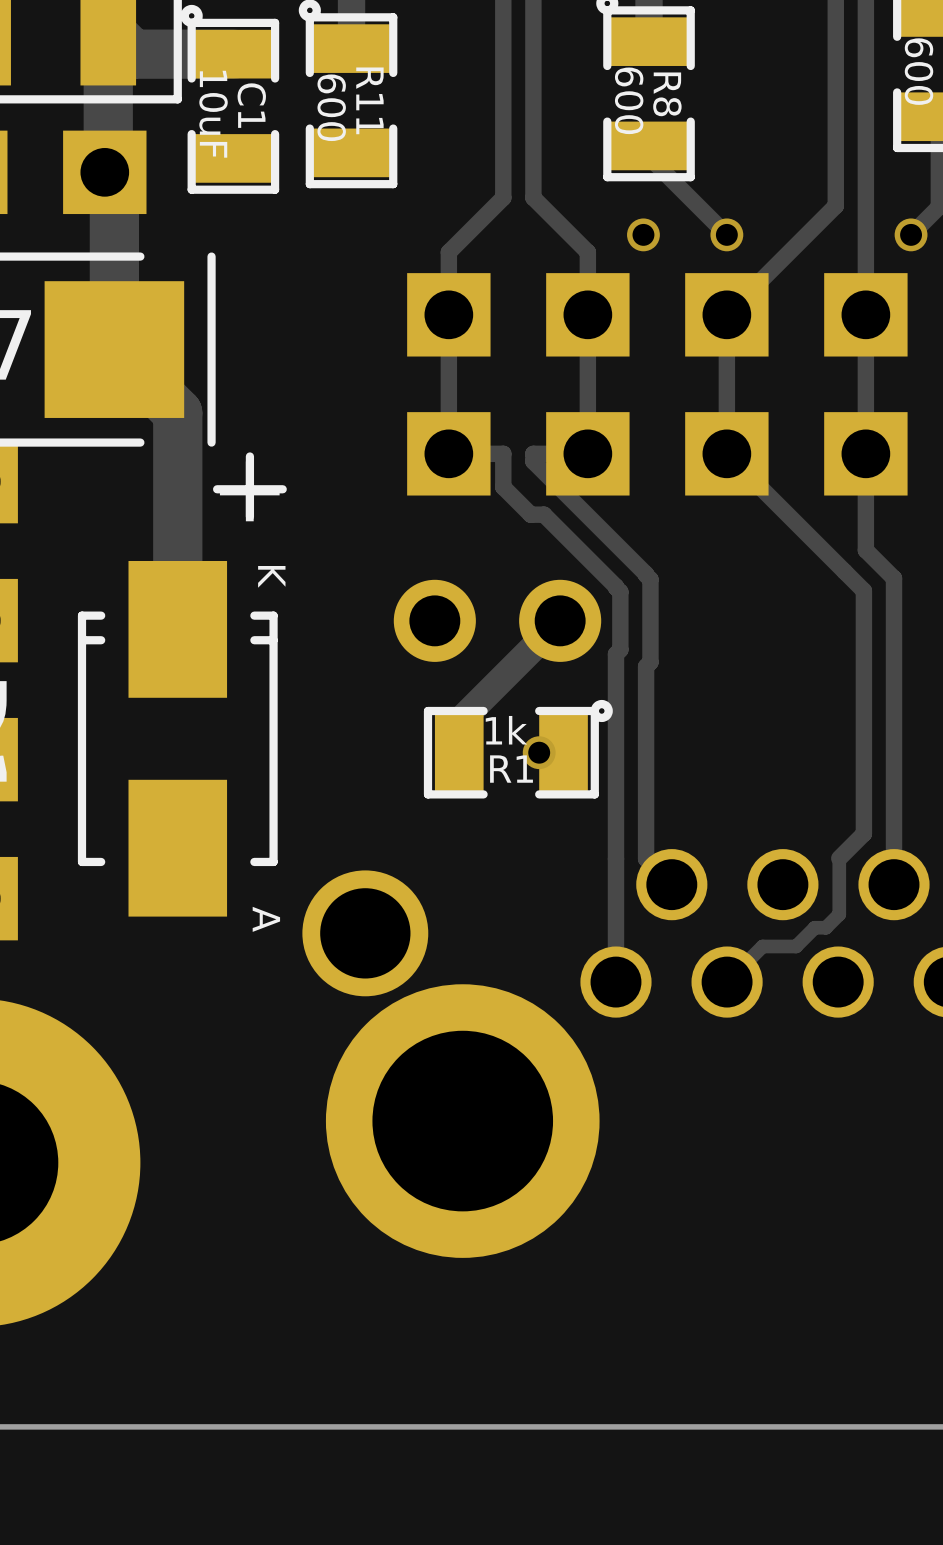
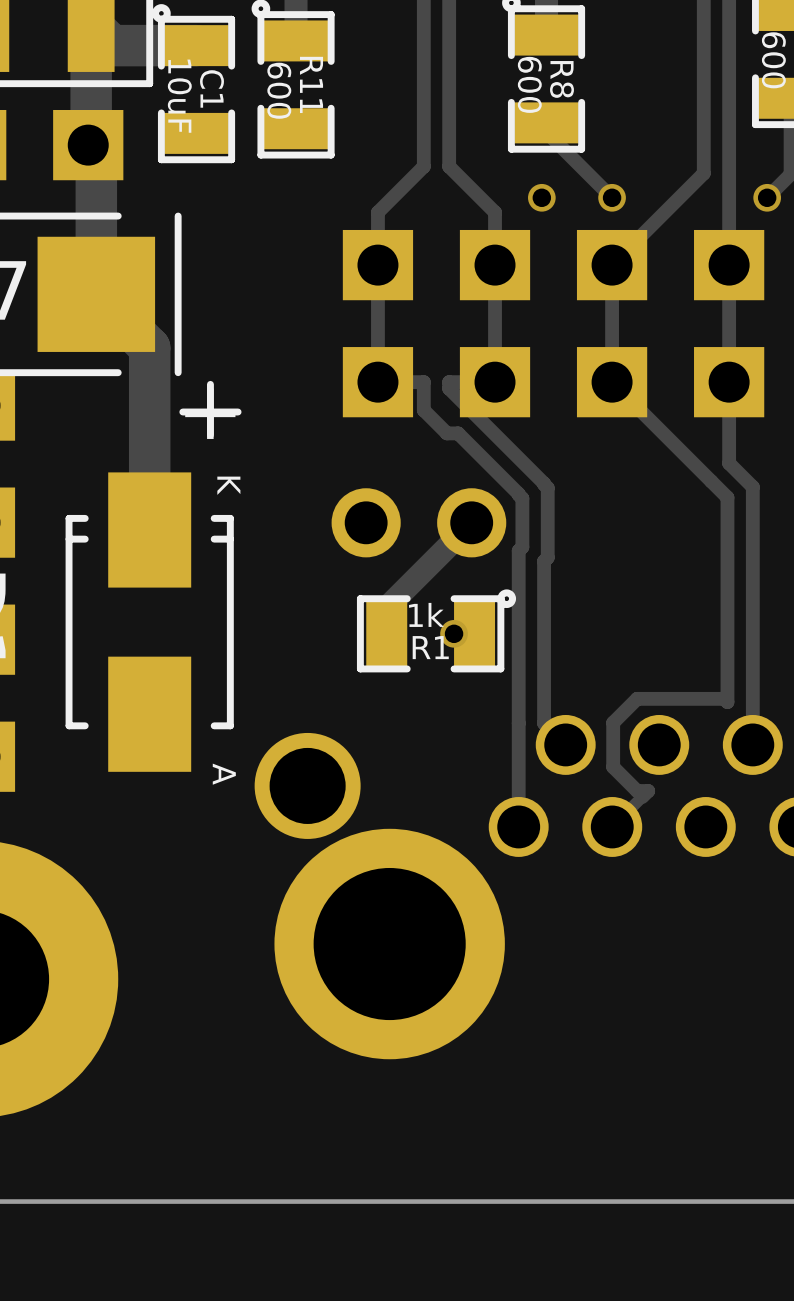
track: (863, 833) (839, 858) (839, 914) (825, 927) (814, 927) (796, 946) (762, 946) -> (727, 702) (724, 698) (637, 698) (613, 722) (613, 767) (637, 791) (648, 791) (642, 797)

